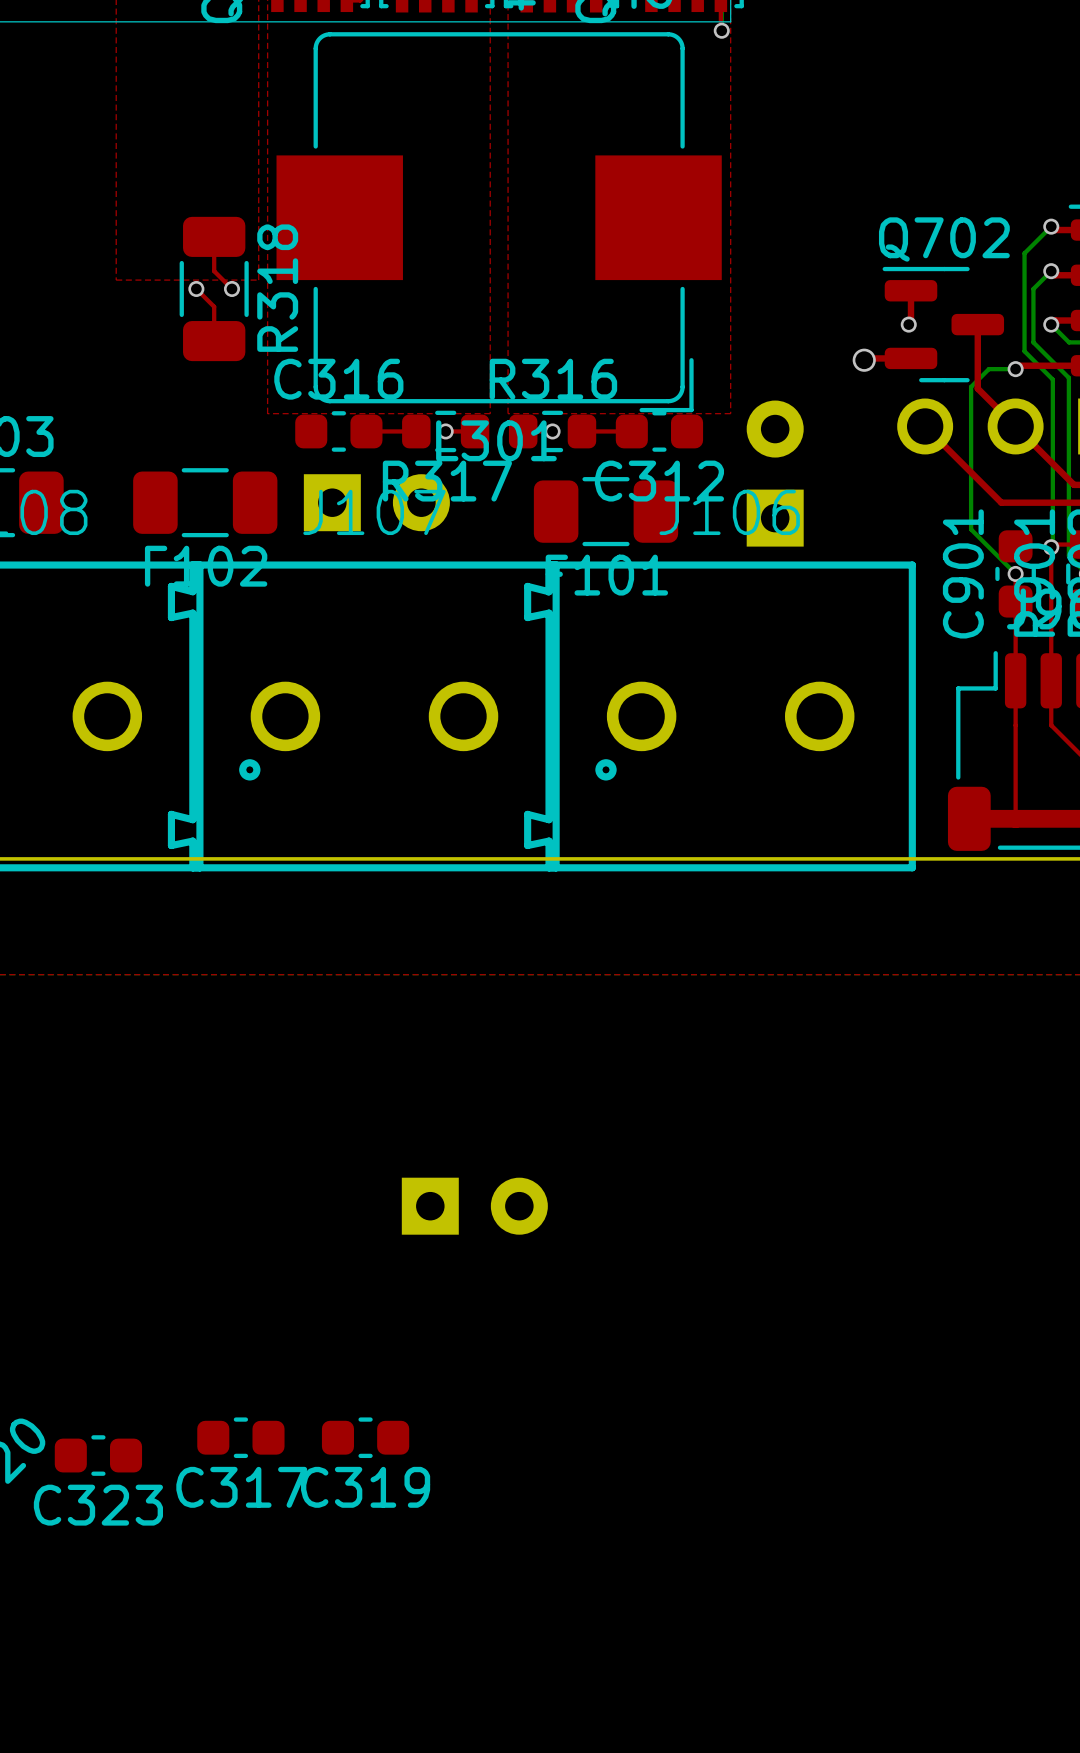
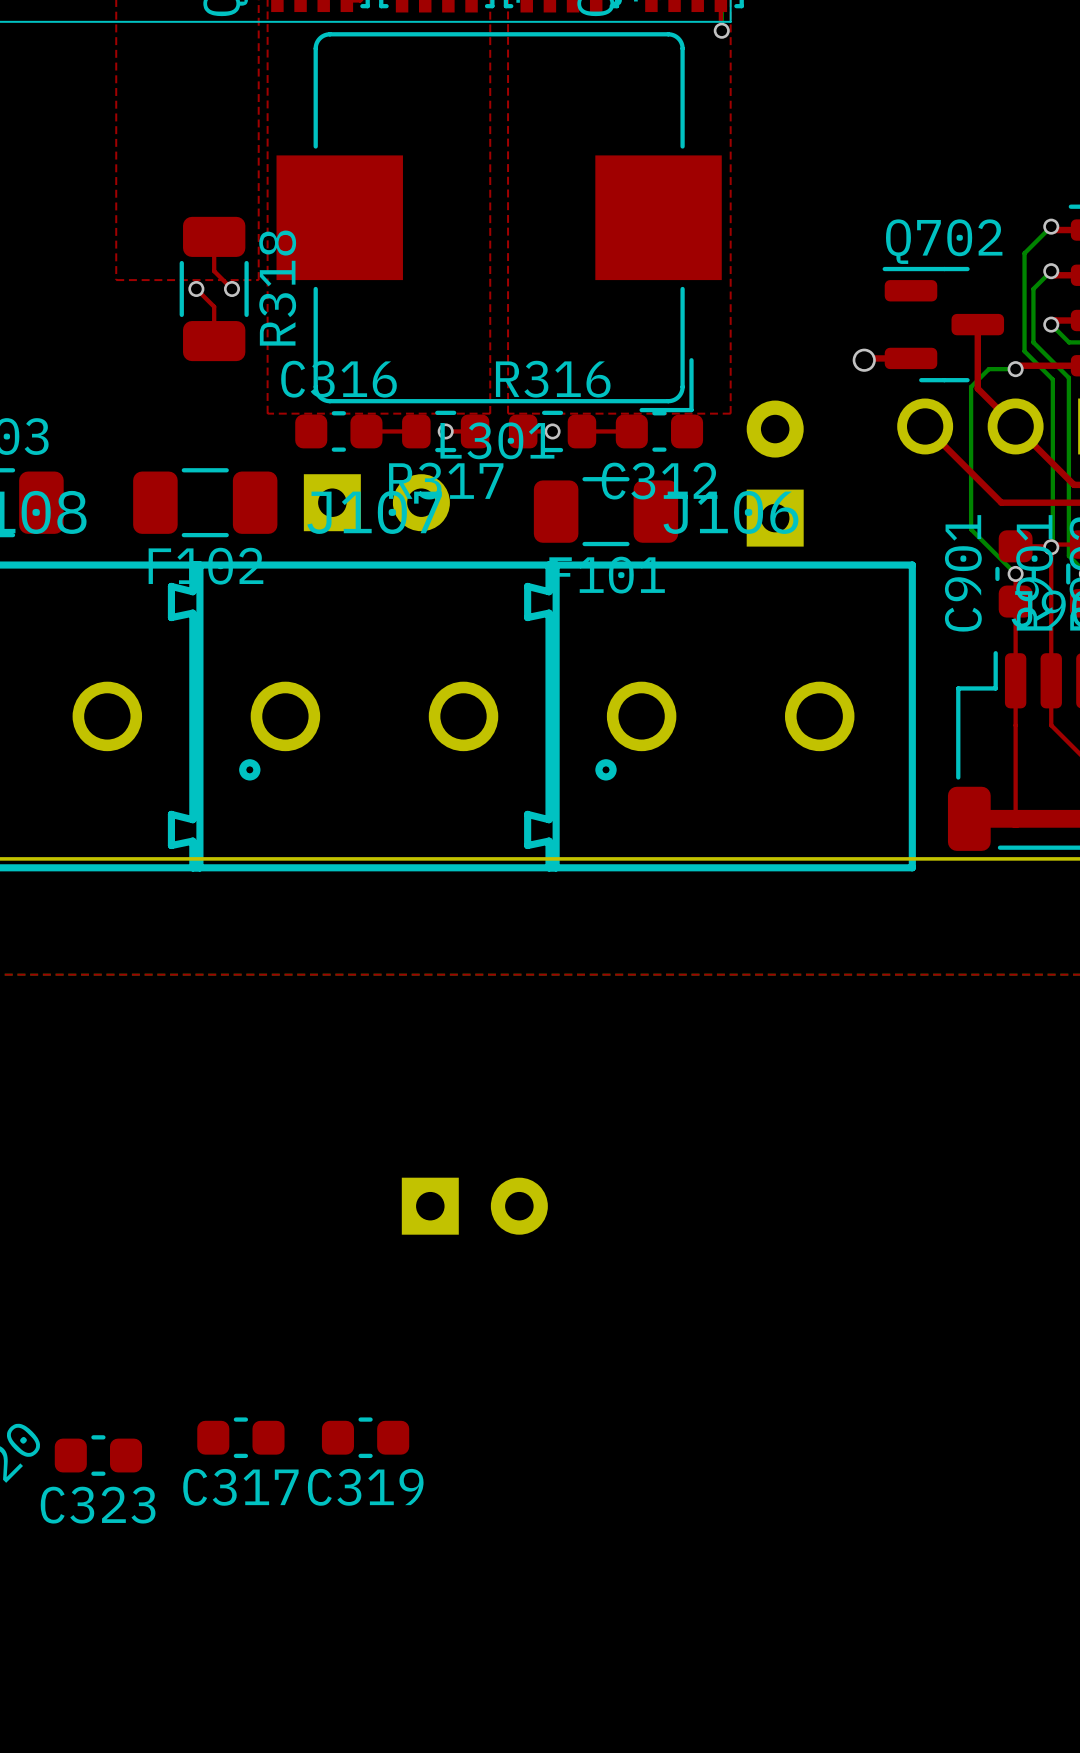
top track: (910, 290) (910, 322) (908, 324) -> none
via: (908, 324) -> none

